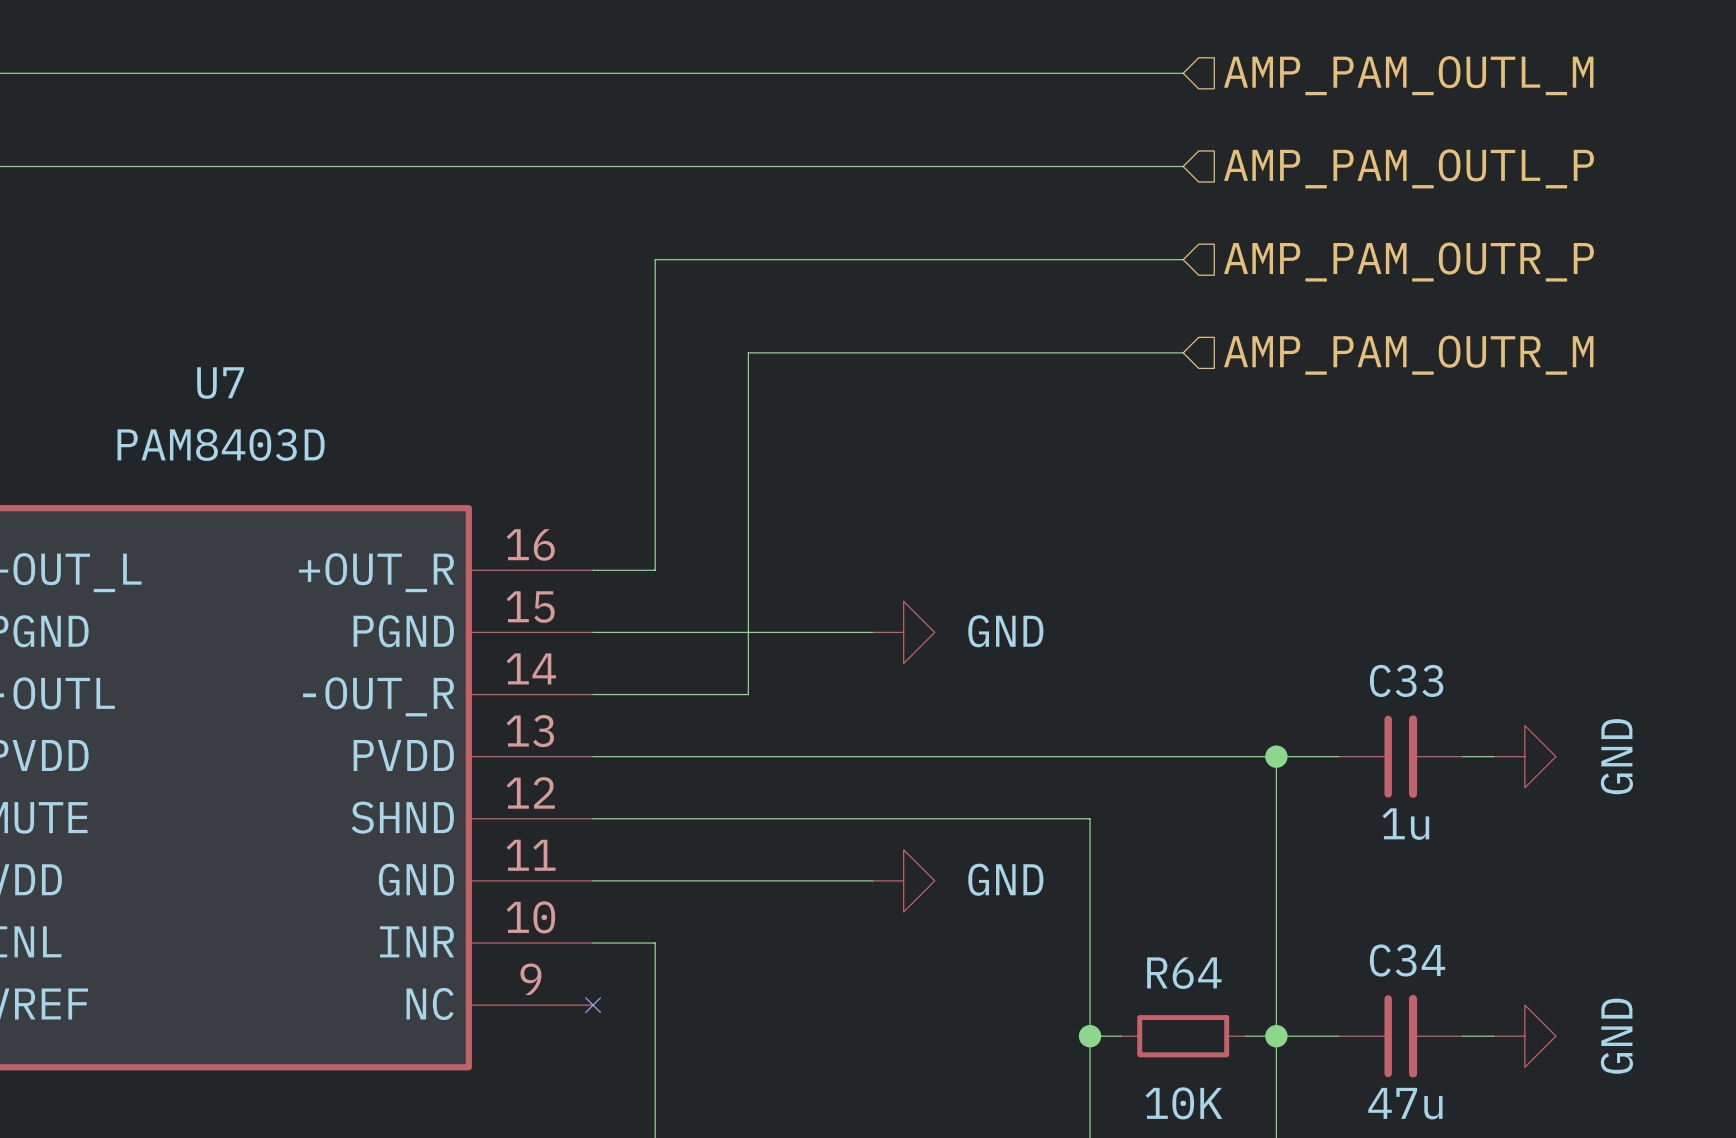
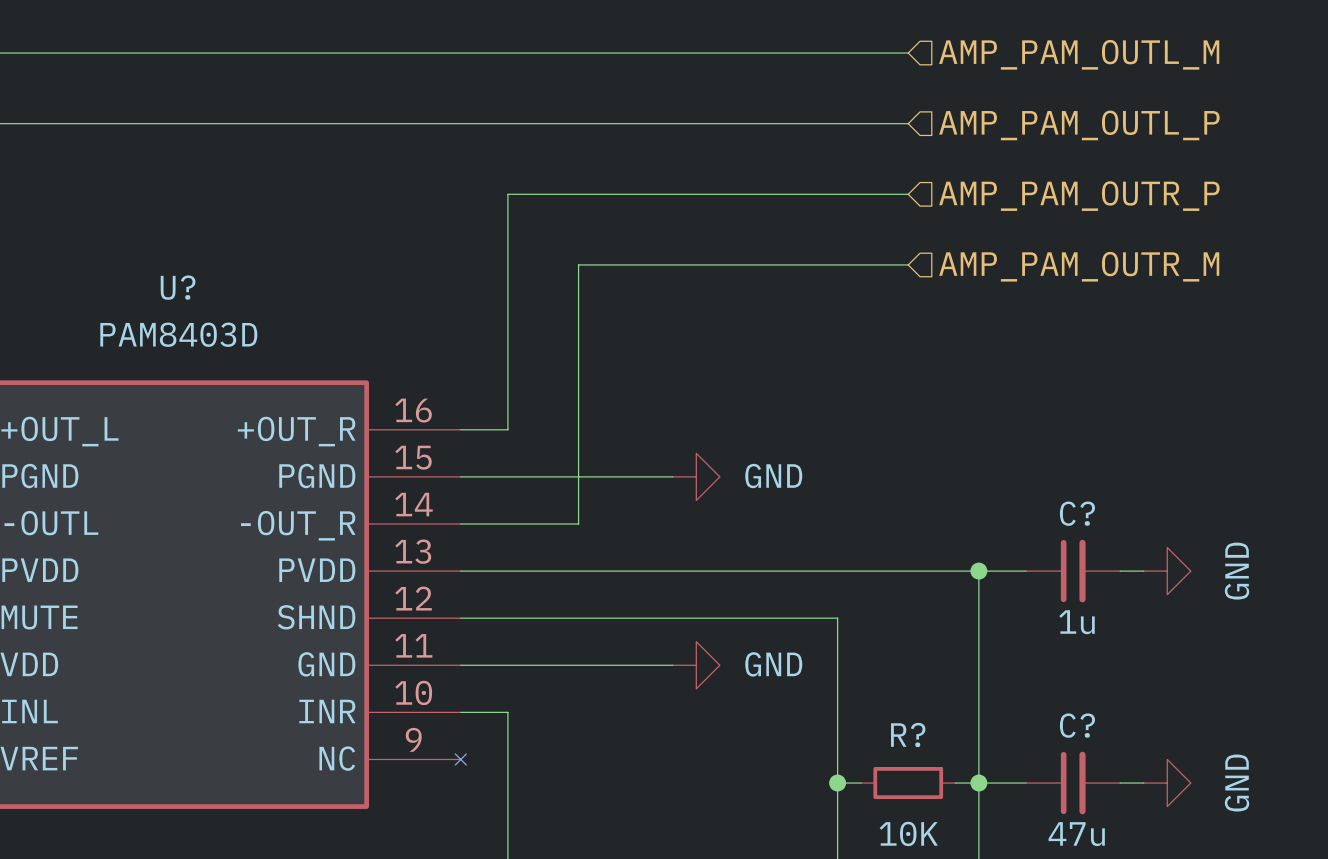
U7 name: U7 (220, 383) -> U? (178, 287)
C33 name: C33 (1406, 680) -> C? (1077, 513)
C34 name: C34 (1407, 960) -> C? (1077, 725)
R64 name: R64 (1184, 973) -> R? (908, 734)

